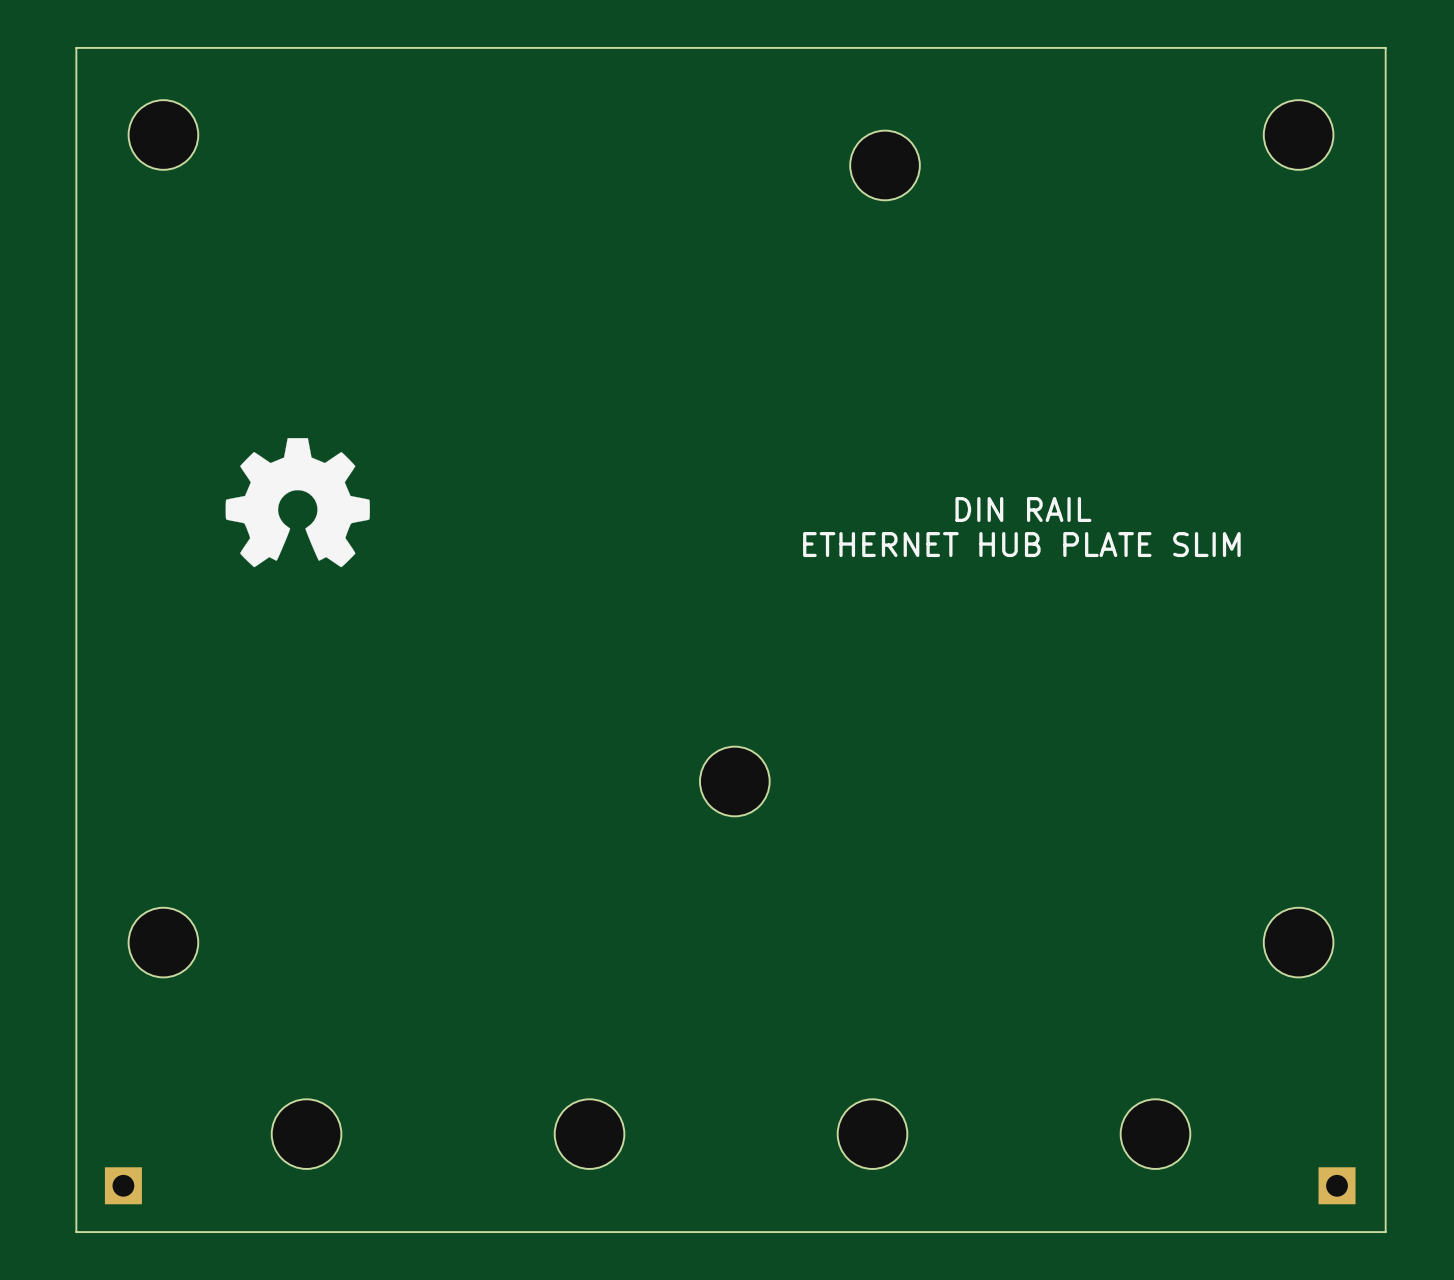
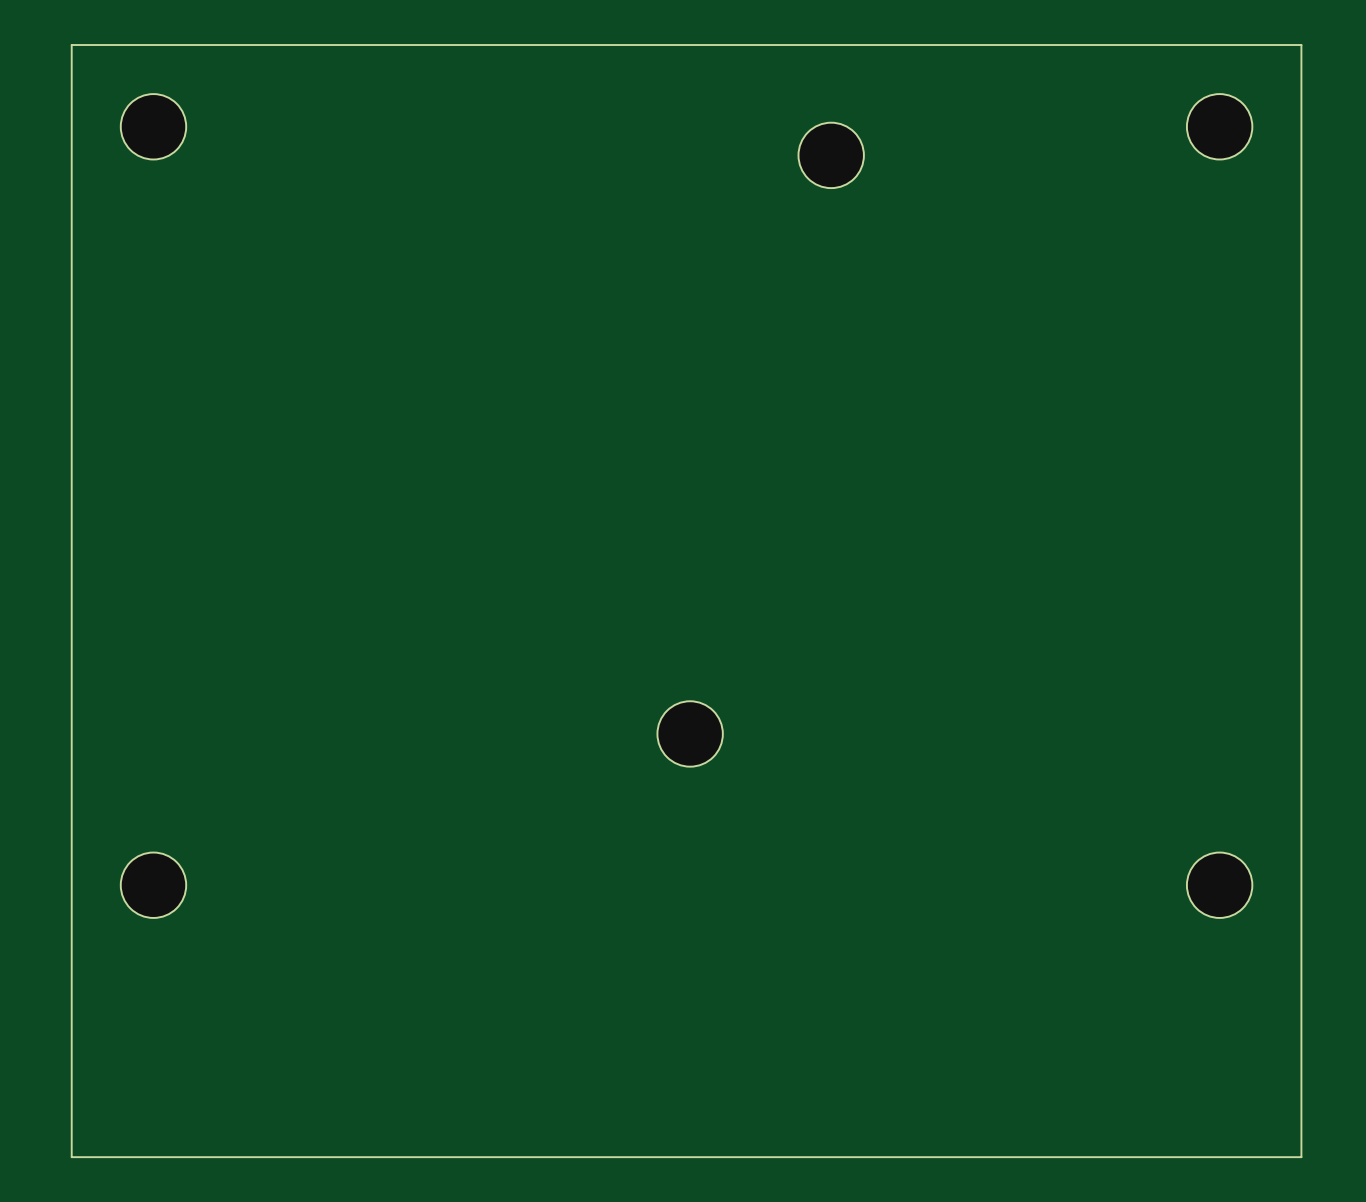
drawing: [225, 438, 370, 568] -> none
text: DIN RAIL (1023, 509) -> none
text: ETHERNET HUB PLATE SLIM (1021, 544) -> none
part: (306, 1134) -> none
part: (589, 1134) -> none
part: (872, 1134) -> none
part: (1155, 1134) -> none
part: (123, 1185) -> none
part: (1337, 1185) -> none

